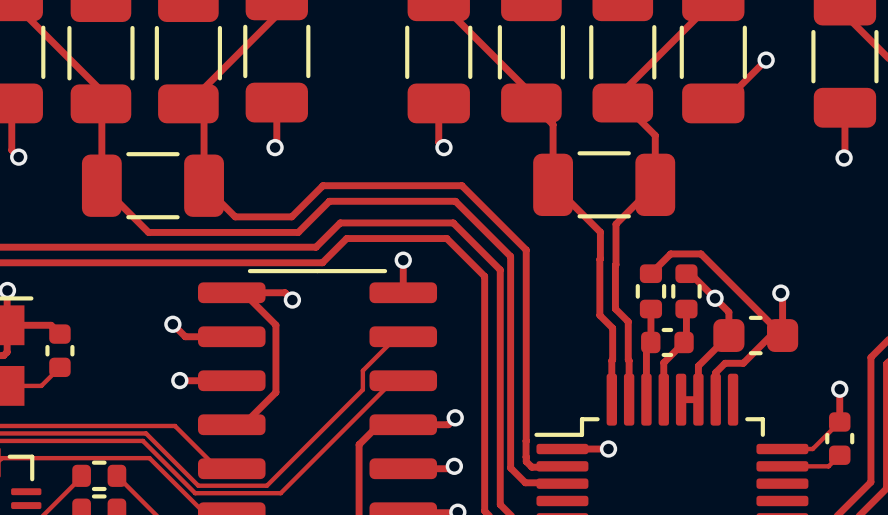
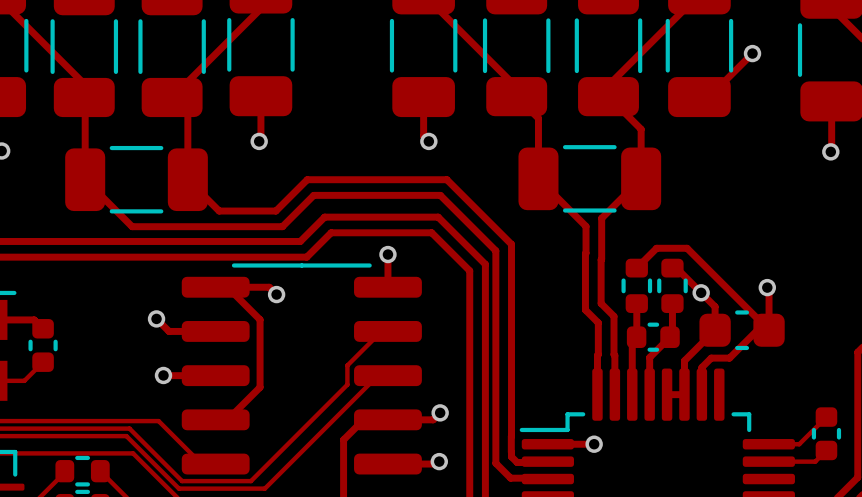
track: (839, 389) (839, 421) -> none
via: (839, 389) -> none

